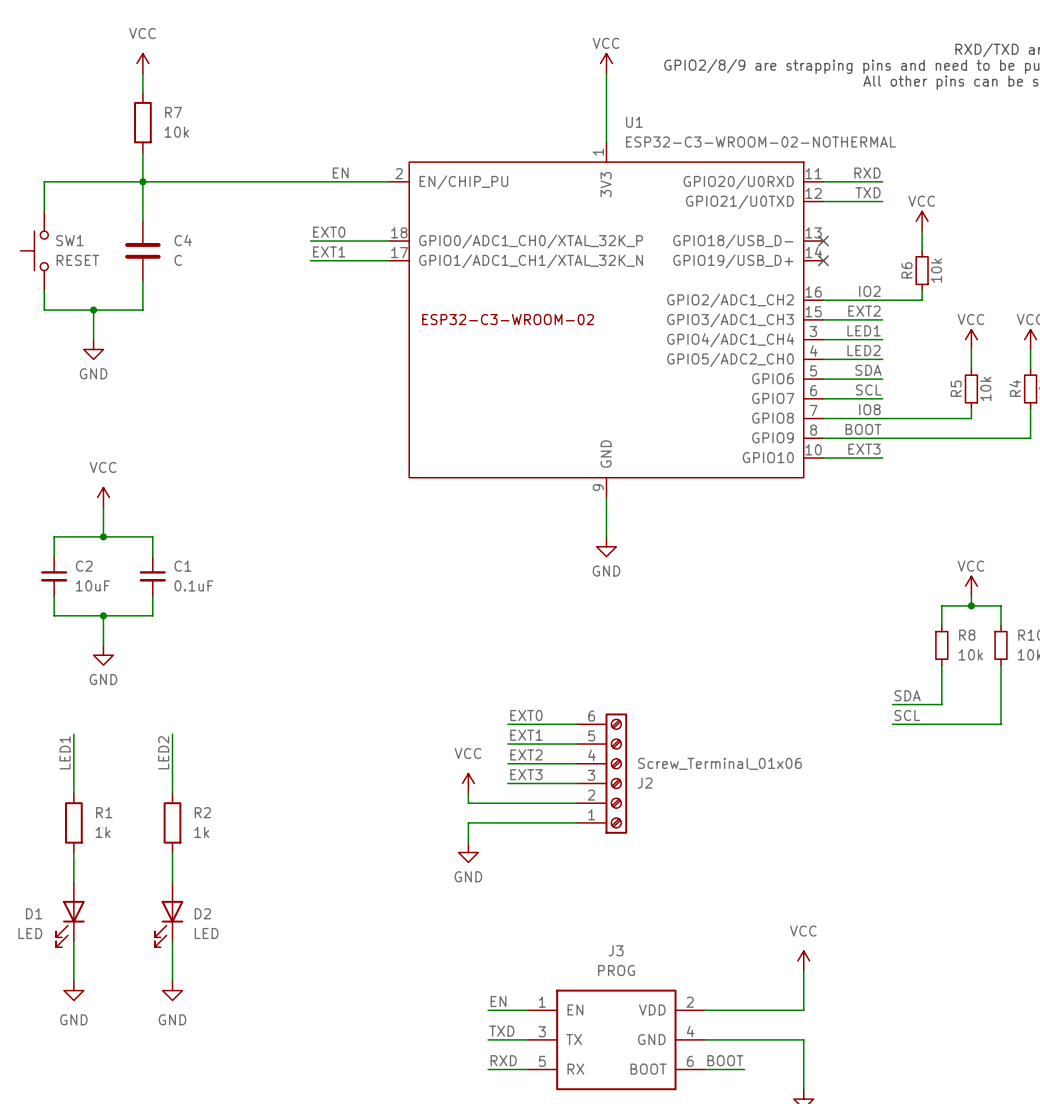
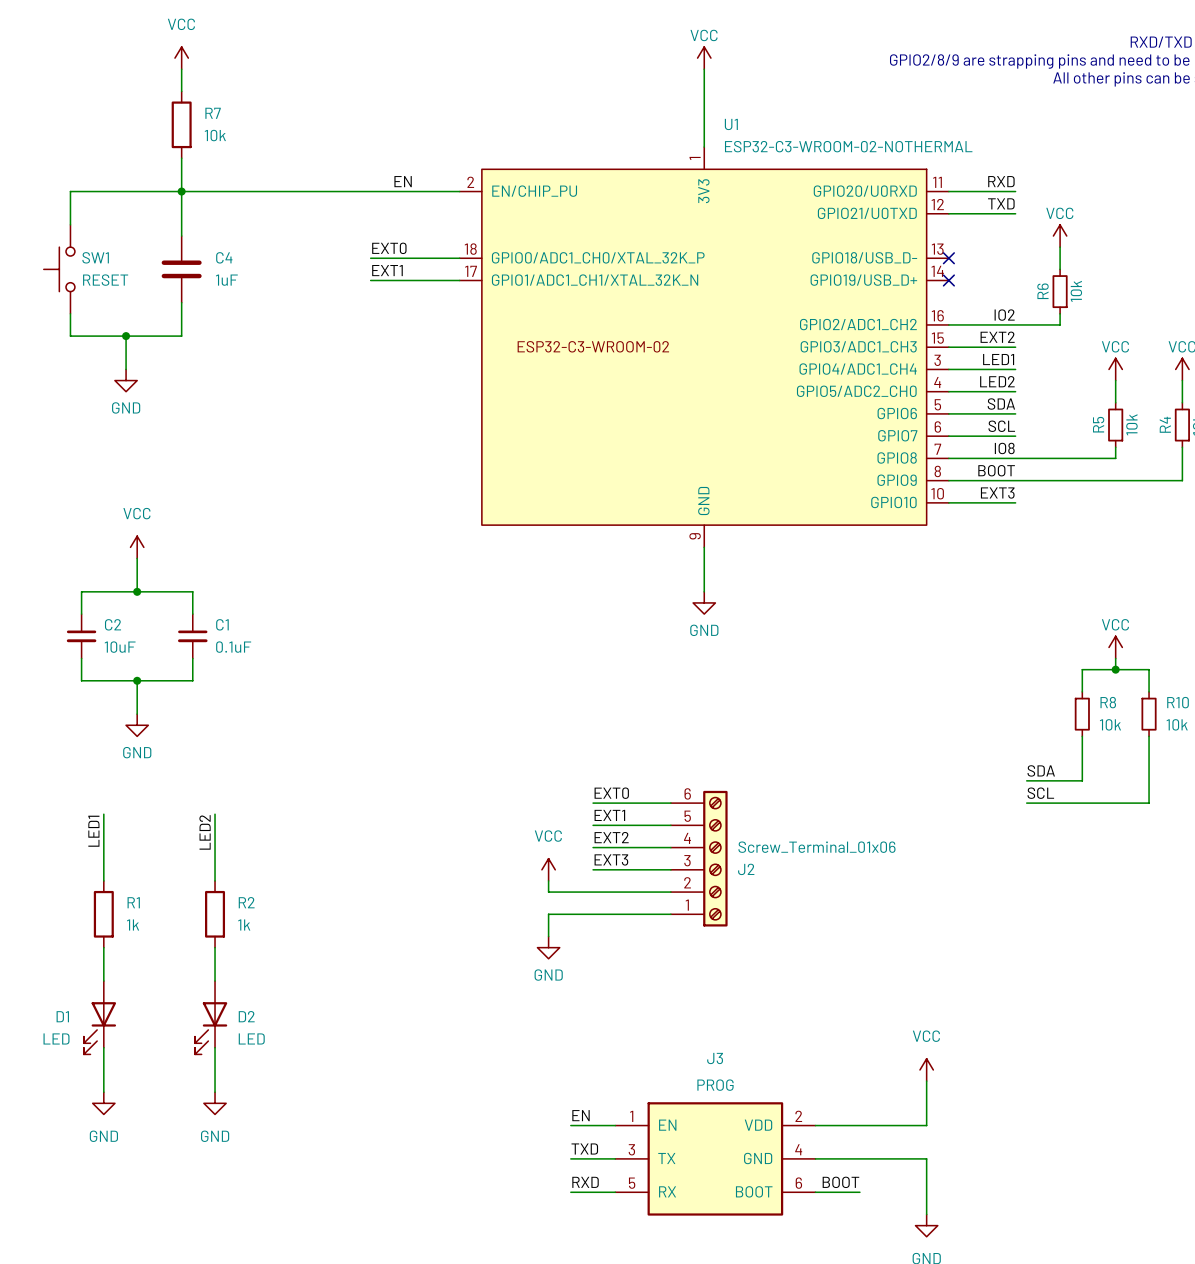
C4 value: C (178, 260) -> 1uF (226, 280)
J3 value: PROG (616, 970) -> none
J3 text: none -> PROG (715, 1085)

